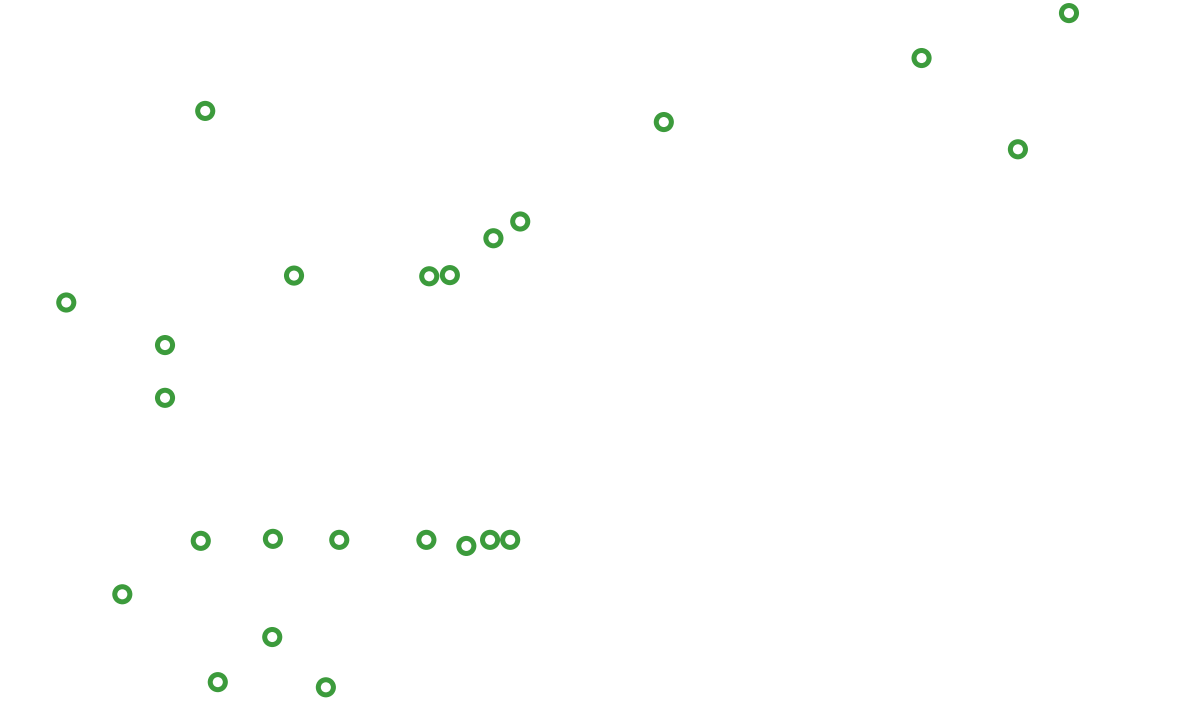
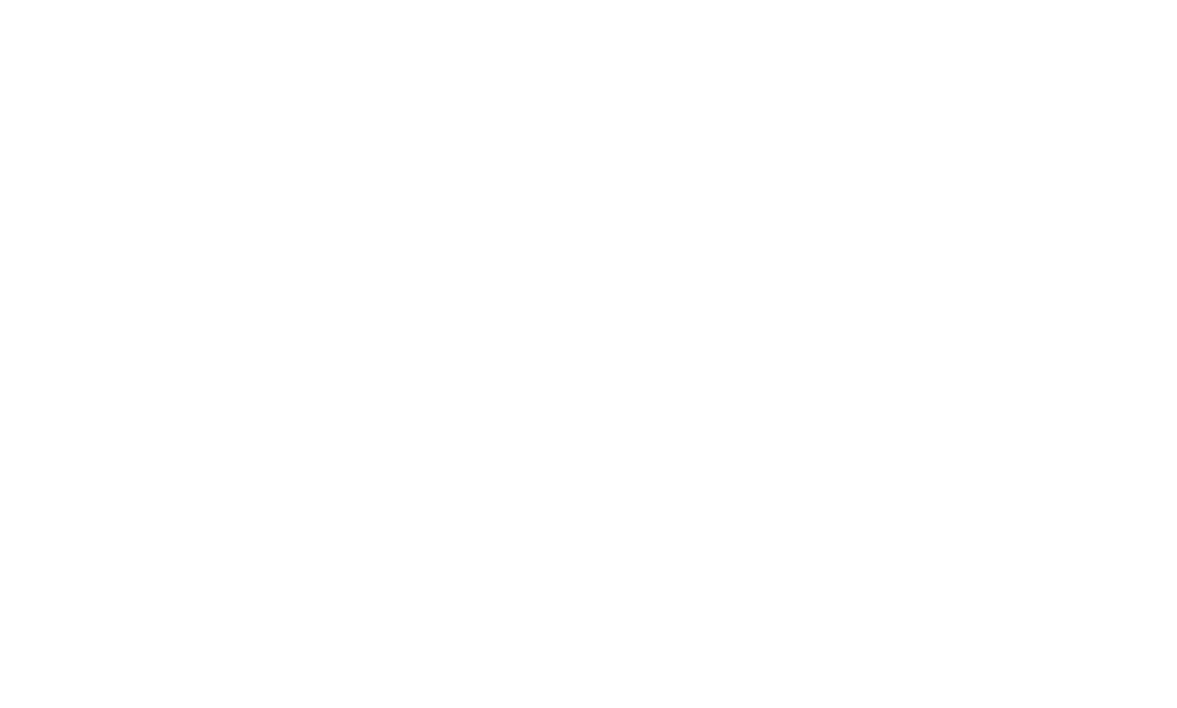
via: (1068, 13) -> none
via: (921, 58) -> none
via: (205, 110) -> none
via: (663, 122) -> none
via: (1017, 149) -> none
via: (520, 221) -> none
via: (493, 238) -> none
via: (294, 275) -> none
via: (449, 275) -> none
via: (429, 276) -> none
via: (66, 302) -> none
via: (165, 345) -> none
via: (165, 397) -> none
via: (272, 538) -> none
via: (339, 539) -> none
via: (426, 539) -> none
via: (490, 539) -> none
via: (510, 539) -> none
via: (200, 540) -> none
via: (466, 545) -> none
via: (122, 594) -> none
via: (272, 637) -> none
via: (217, 682) -> none
via: (325, 687) -> none

